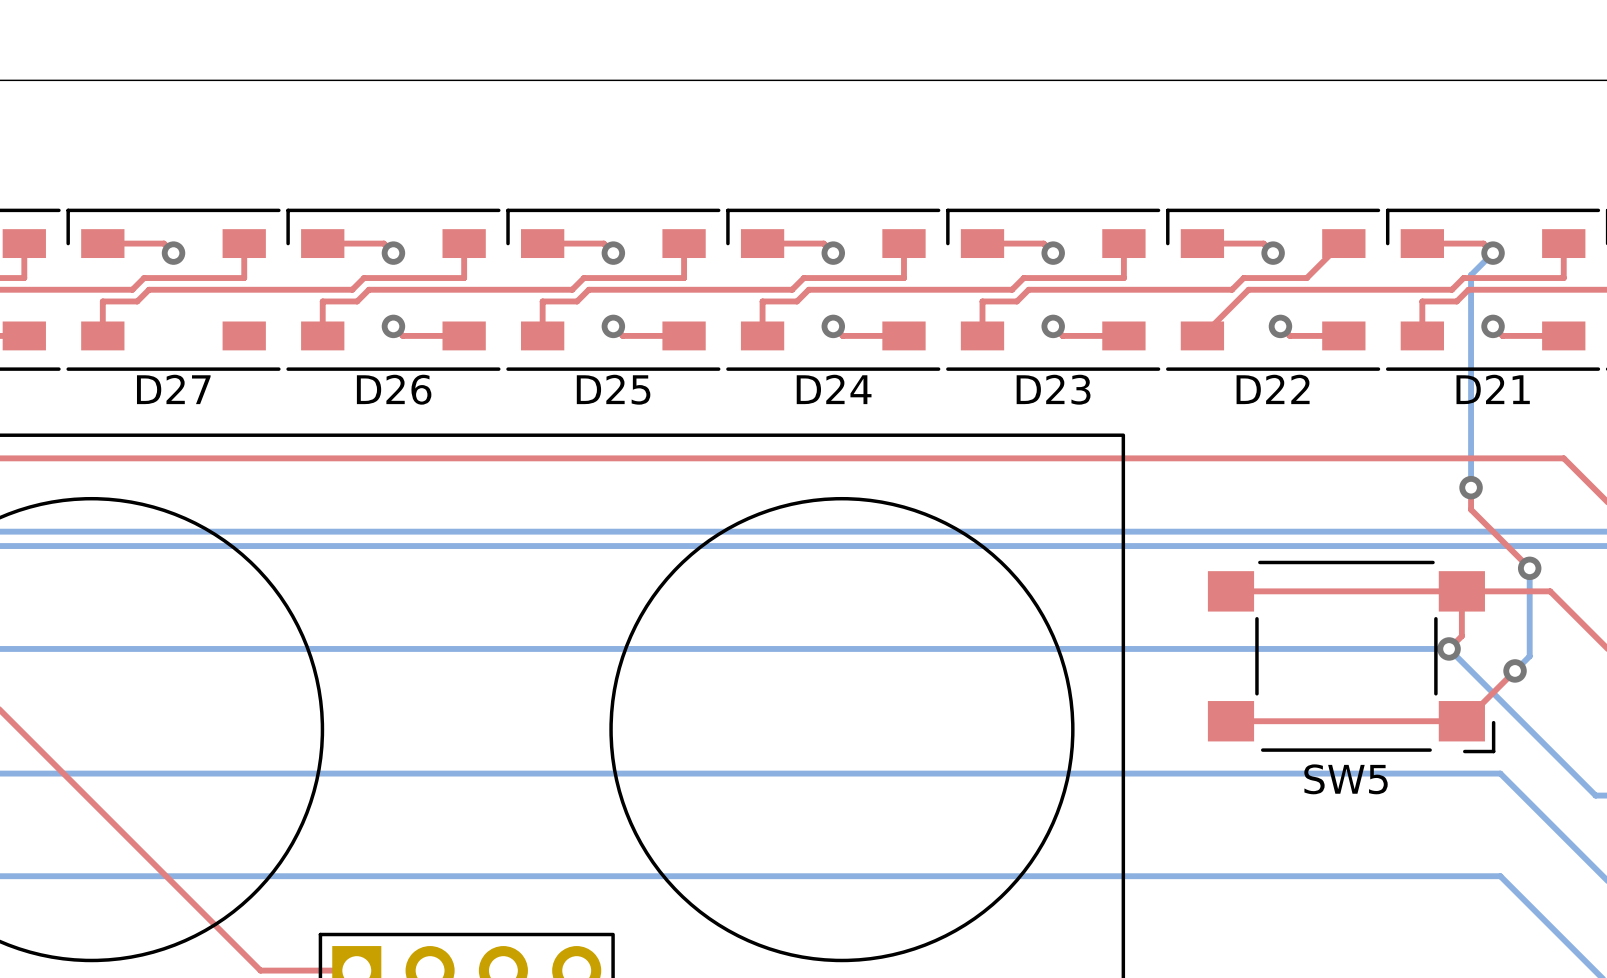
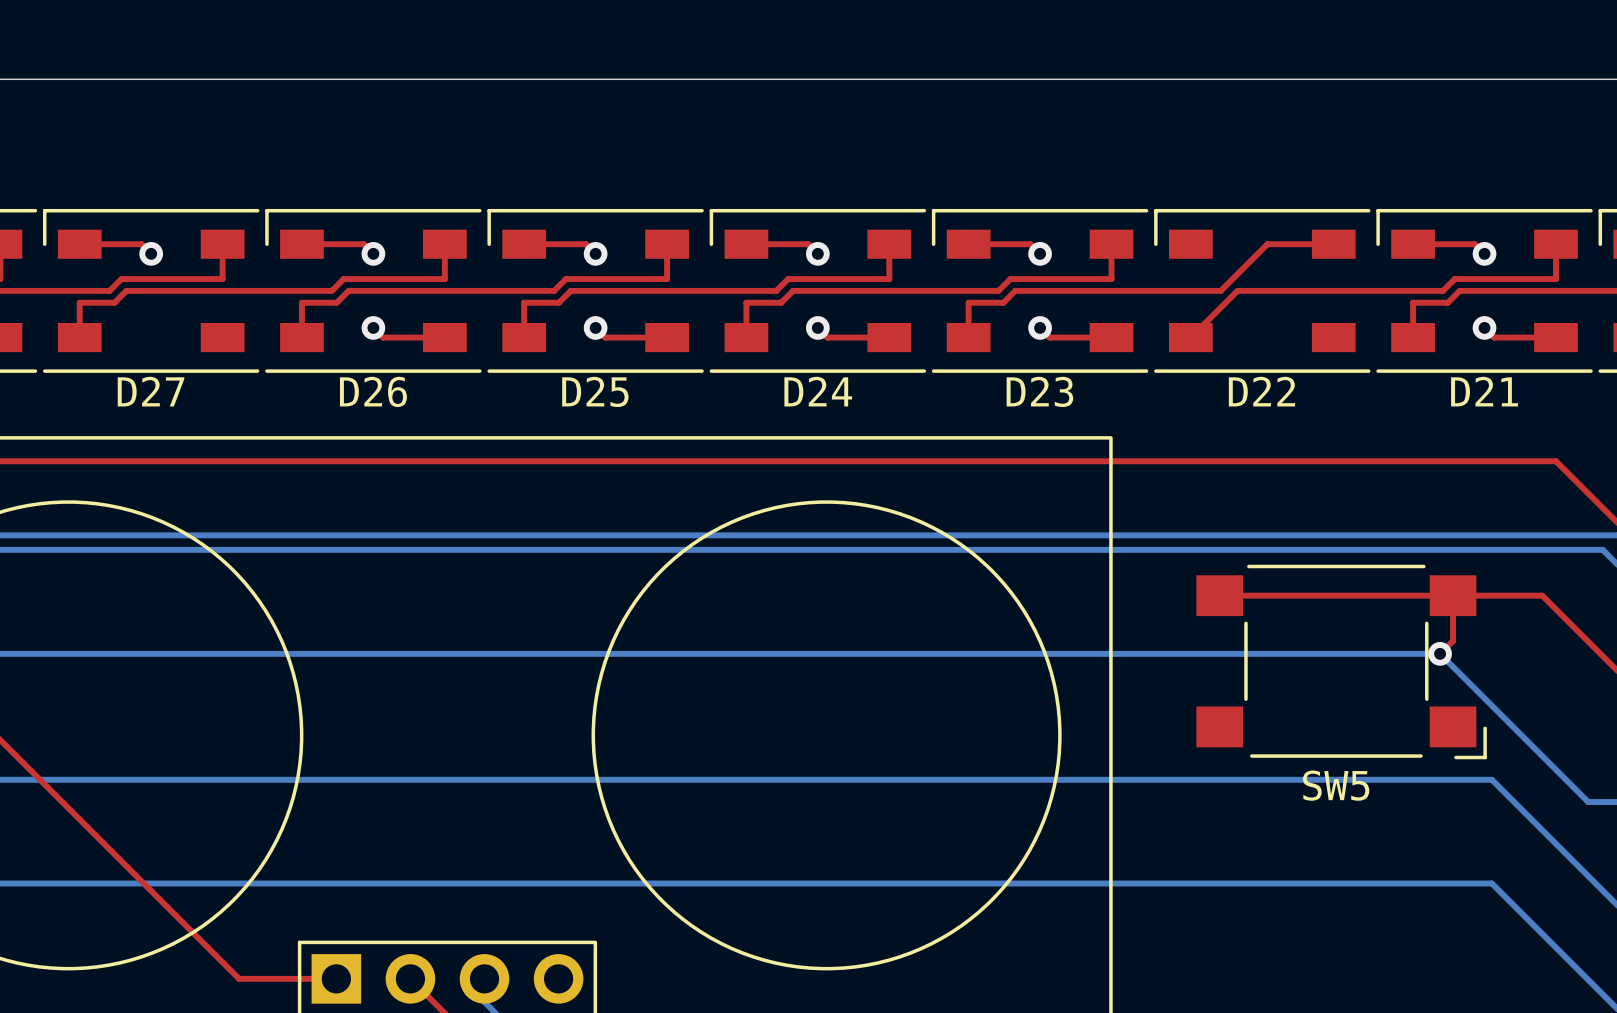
top track: (1202, 243) (1263, 243) (1273, 253) -> none
top track: (1341, 243) (1306, 278) (1243, 278) -> (1331, 244) (1267, 244) (1232, 279)
via: (1273, 253) -> none
bottom track: (1493, 253) (1471, 275) (1471, 487) -> none
top track: (1280, 326) (1289, 335) (1343, 335) -> none
via: (1280, 326) -> none
top track: (1471, 487) (1471, 509) (1529, 568) -> none
via: (1471, 487) -> none
bottom track: (1529, 568) (1529, 656) (1515, 670) -> none
via: (1529, 568) -> none
top track: (1515, 670) (1464, 721) (1230, 721) -> none
via: (1515, 670) -> none

